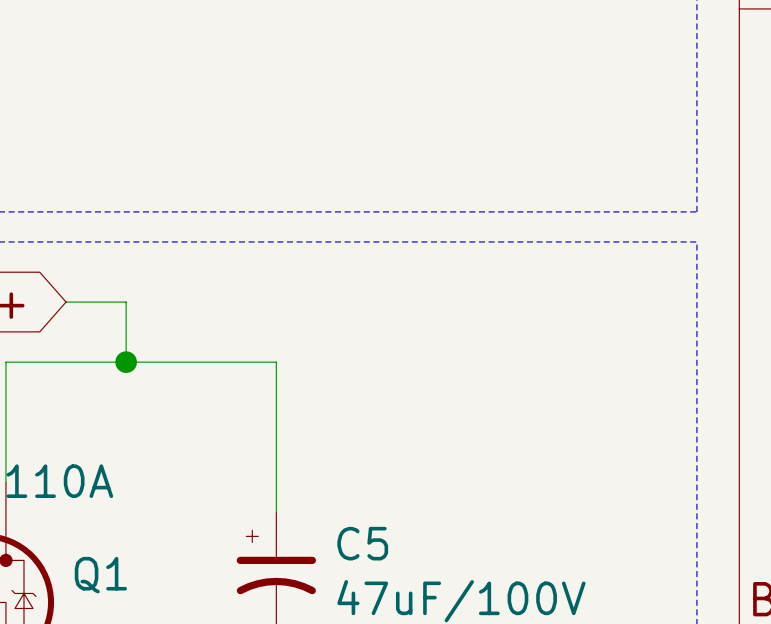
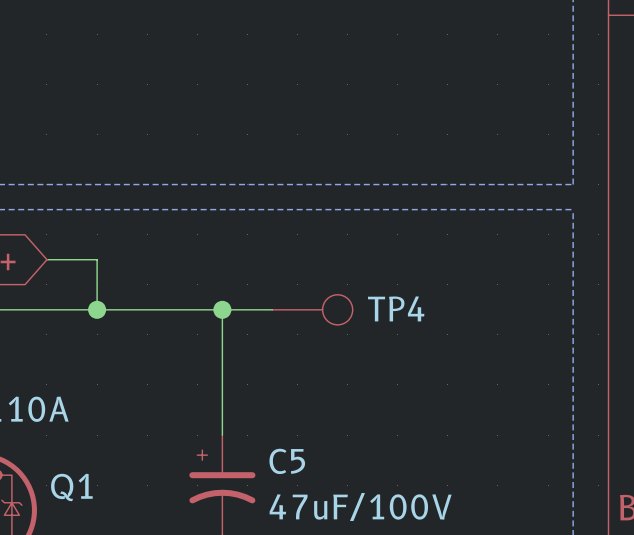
wire: none -> (222, 309) (272, 309)
junction: none -> (222, 309)
TP4: none -> (312, 309)

